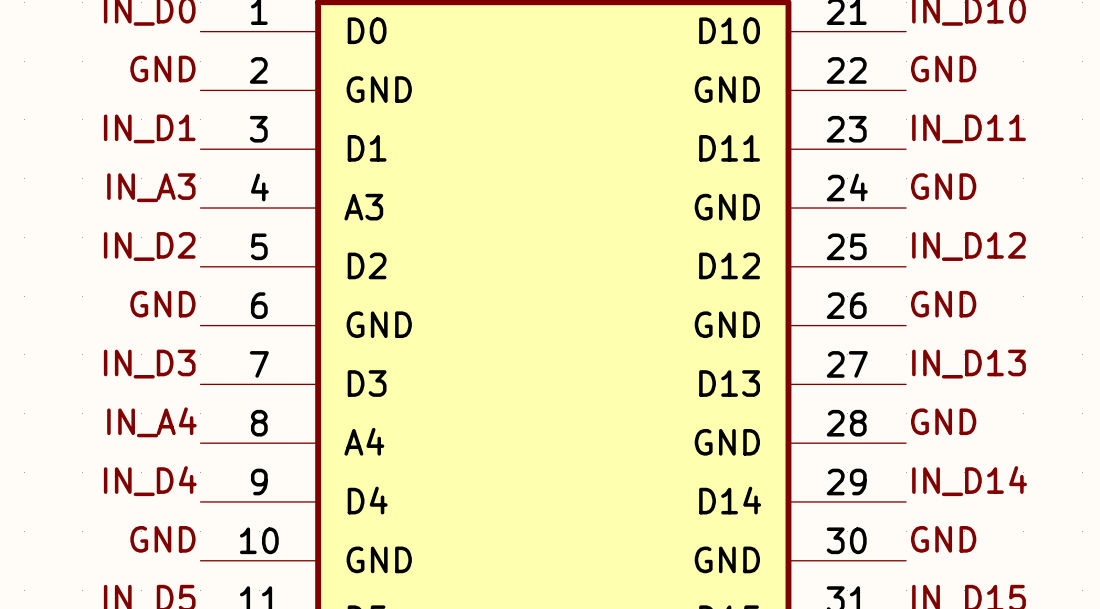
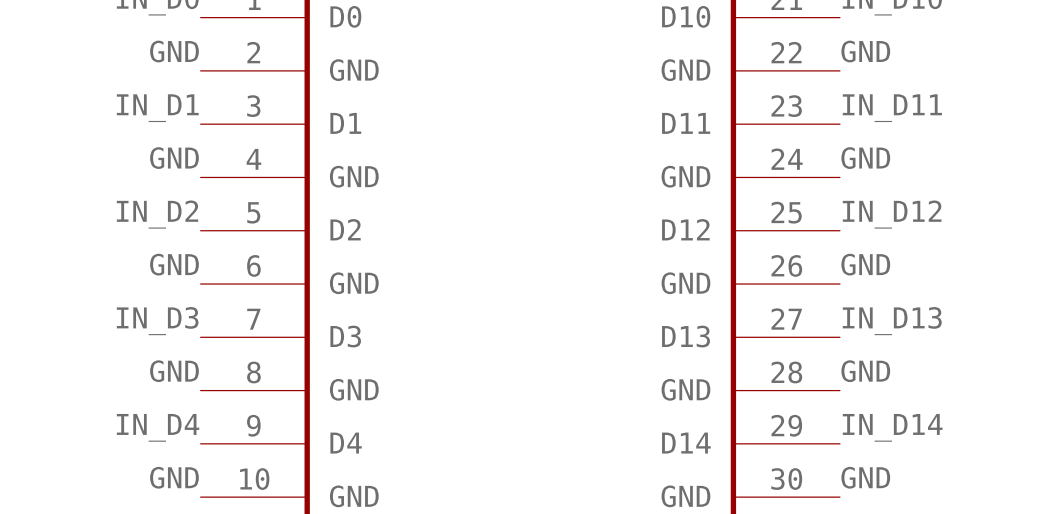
label: IN_A3 (151, 187) -> GND (174, 158)
part pin name: A3 (363, 207) -> GND (354, 176)
label: IN_A4 (151, 422) -> GND (174, 371)
part pin name: A4 (364, 441) -> GND (354, 389)

